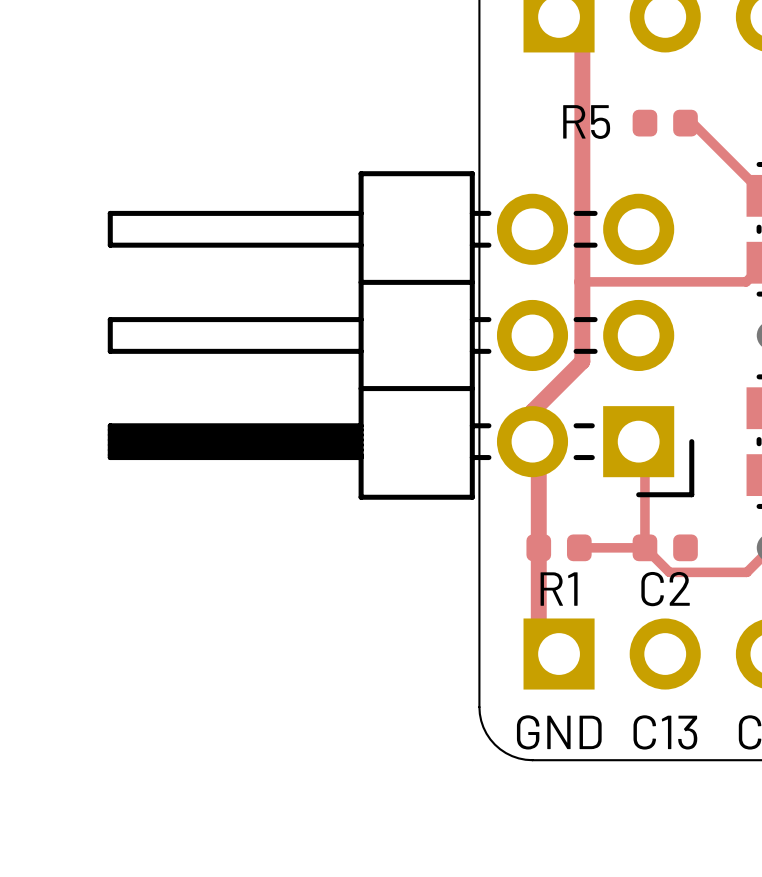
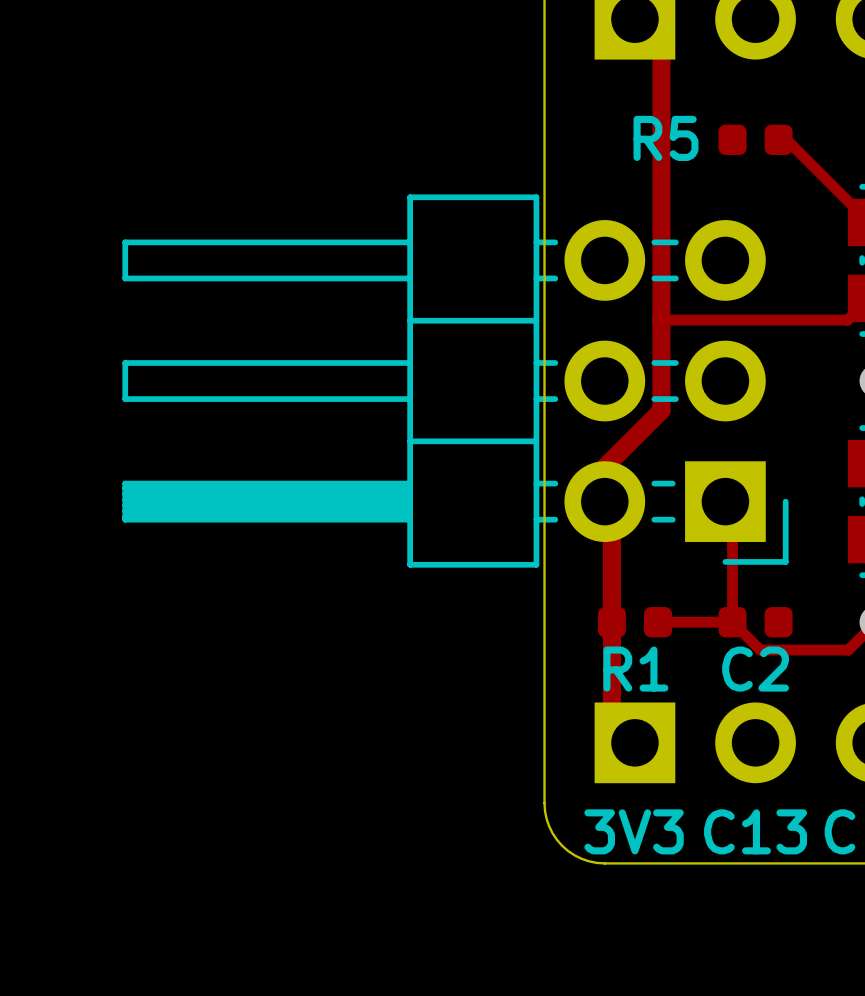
text: GND (559, 732) -> 3V3 (634, 831)

